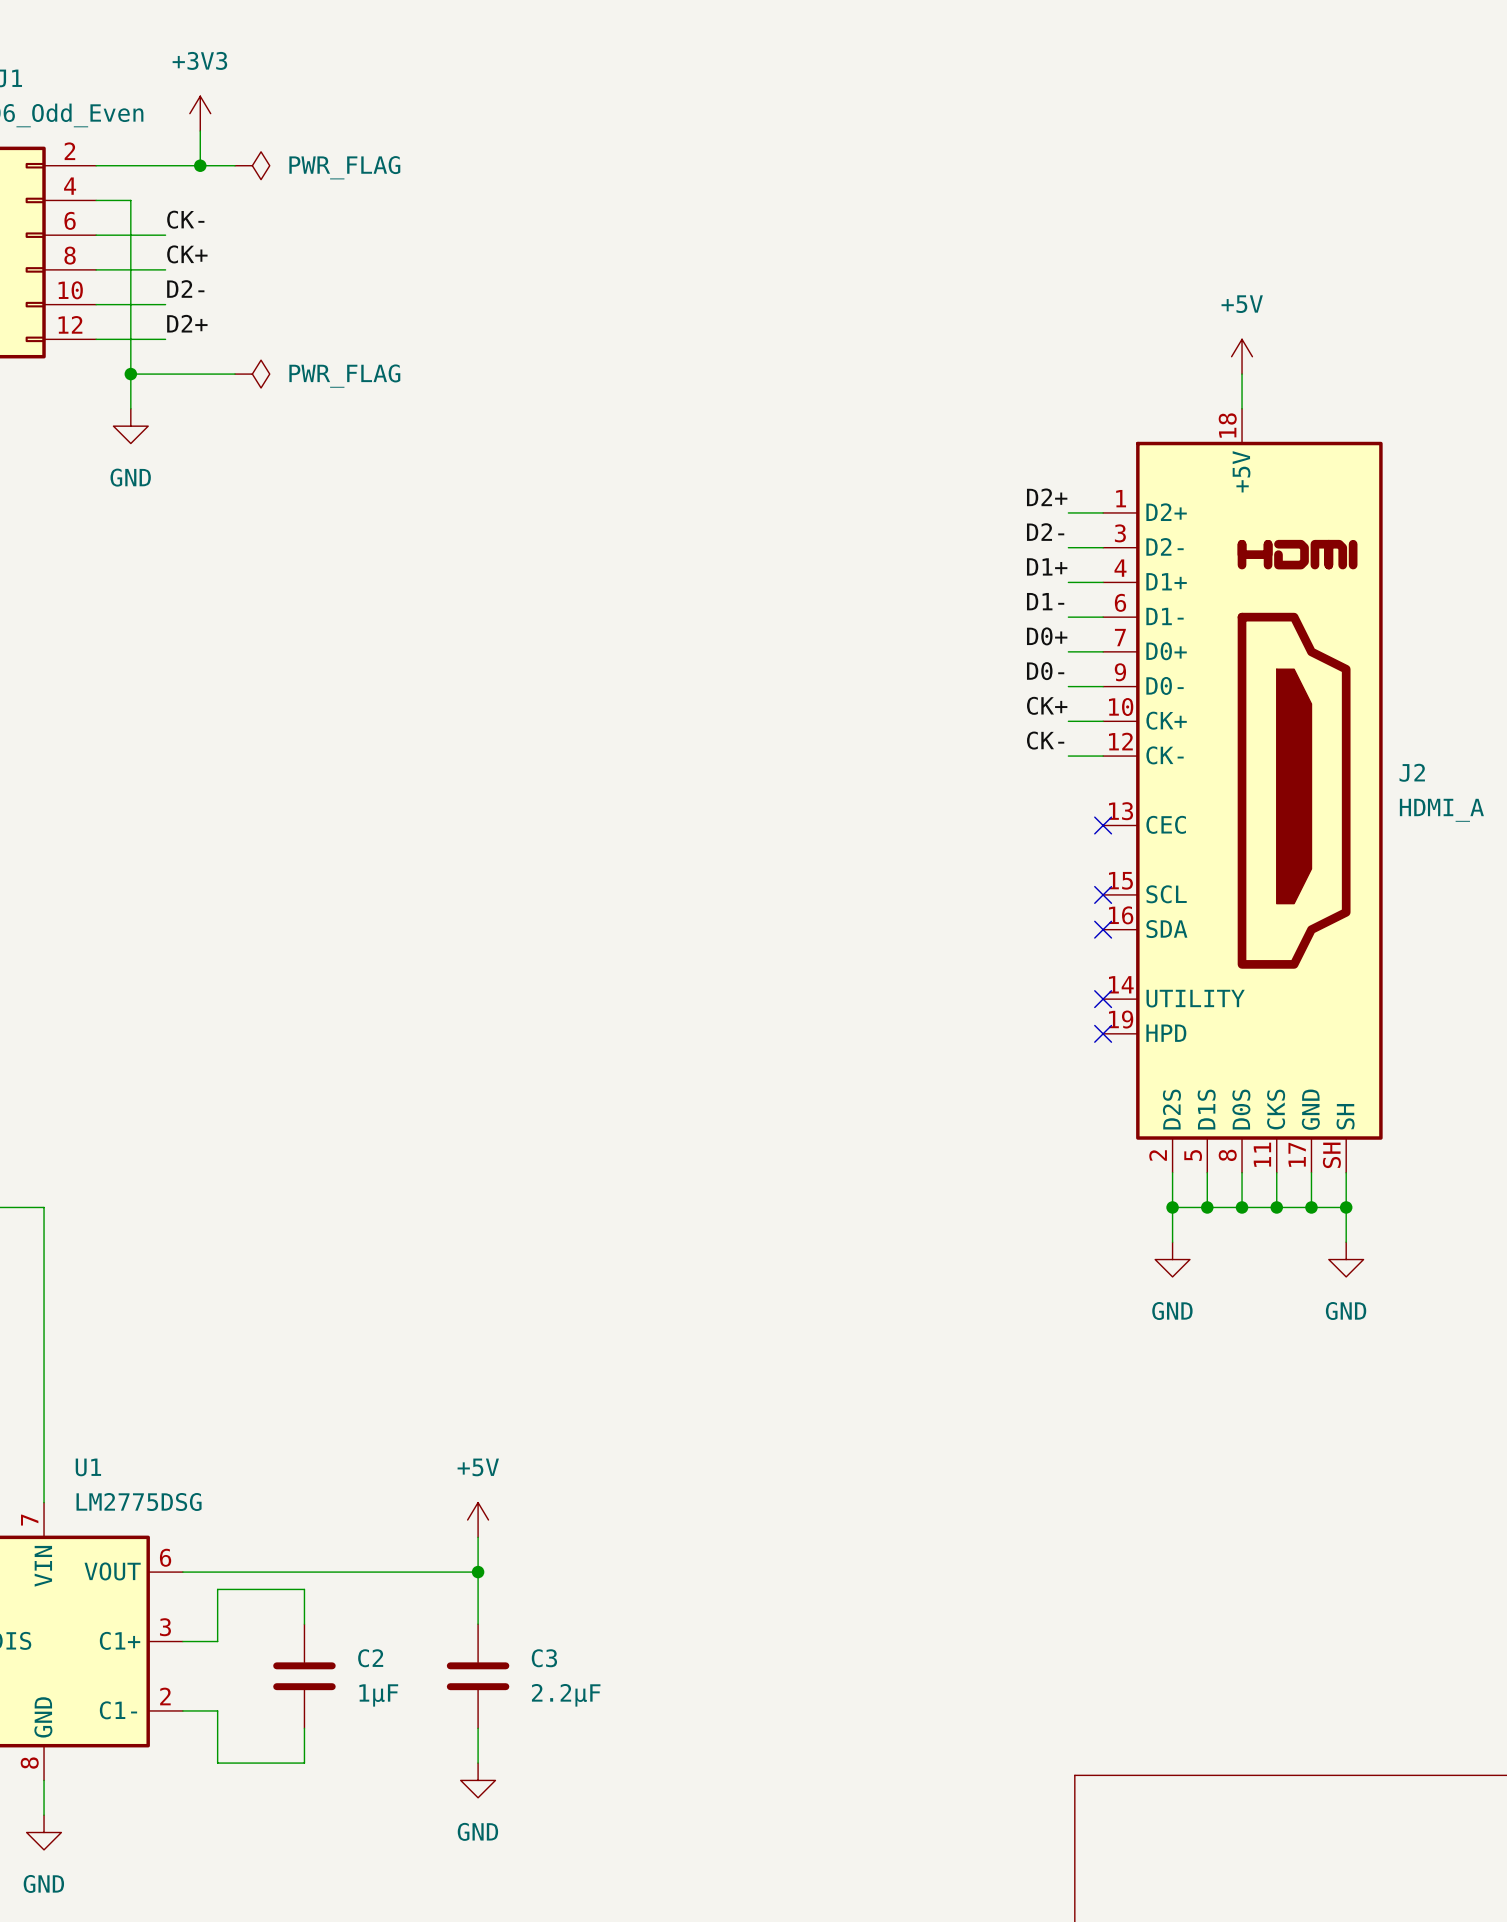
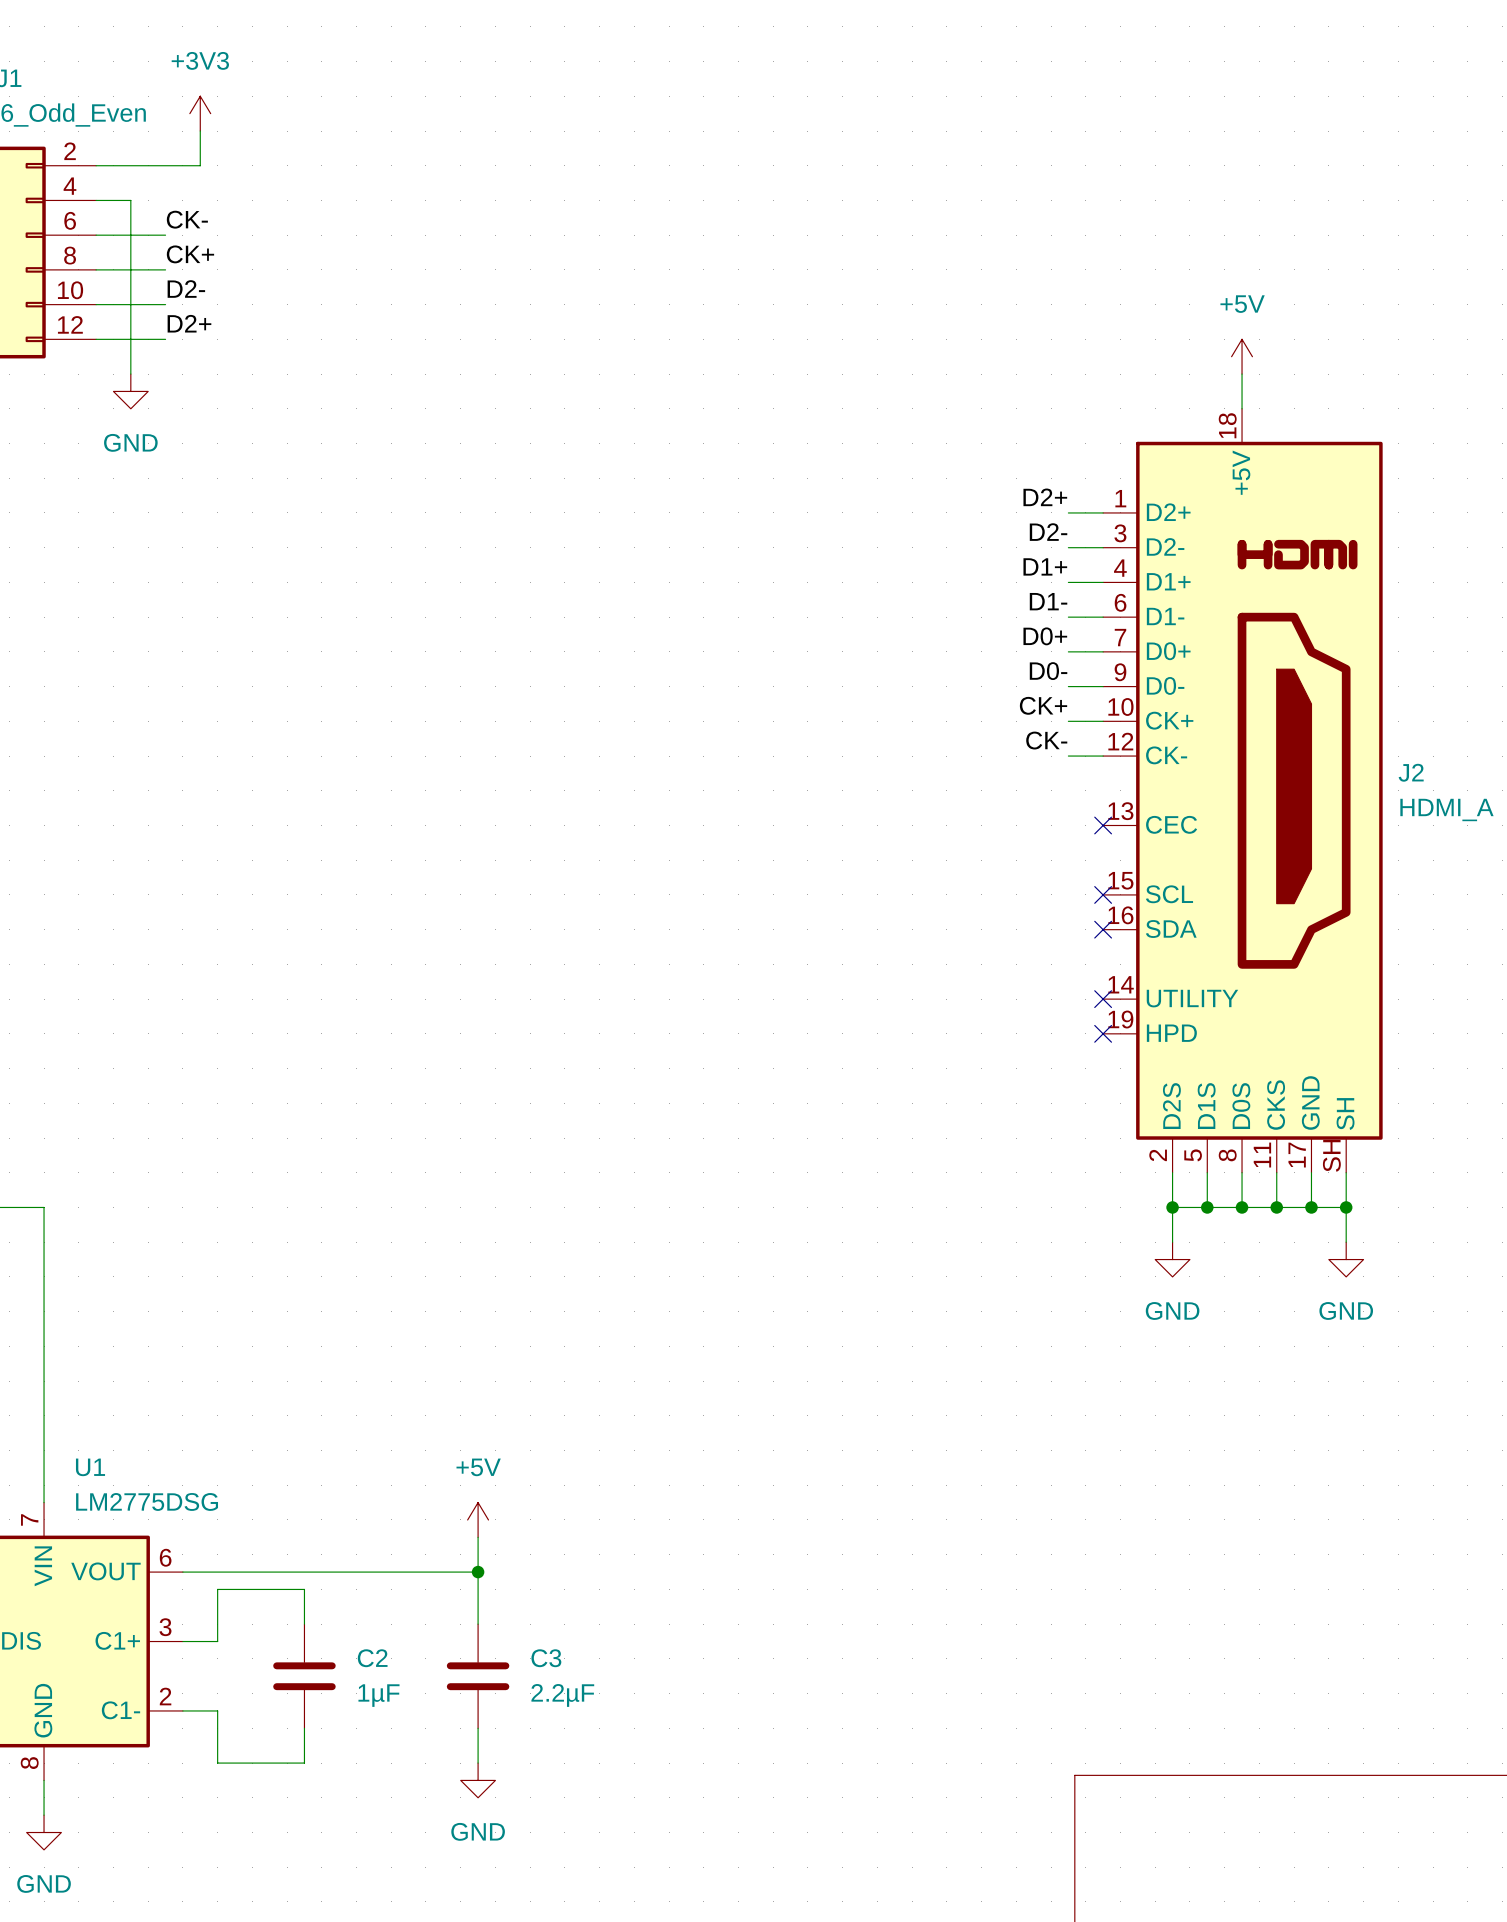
wire: (200, 165) (235, 165) -> none
junction: (200, 165) -> none
power symbol: PWR_FLAG (252, 165) -> none
junction: (130, 374) -> none
wire: (235, 374) (130, 374) (130, 408) -> none
power symbol: PWR_FLAG (252, 374) -> none
power symbol position: GND (130, 426) -> GND (130, 391)

